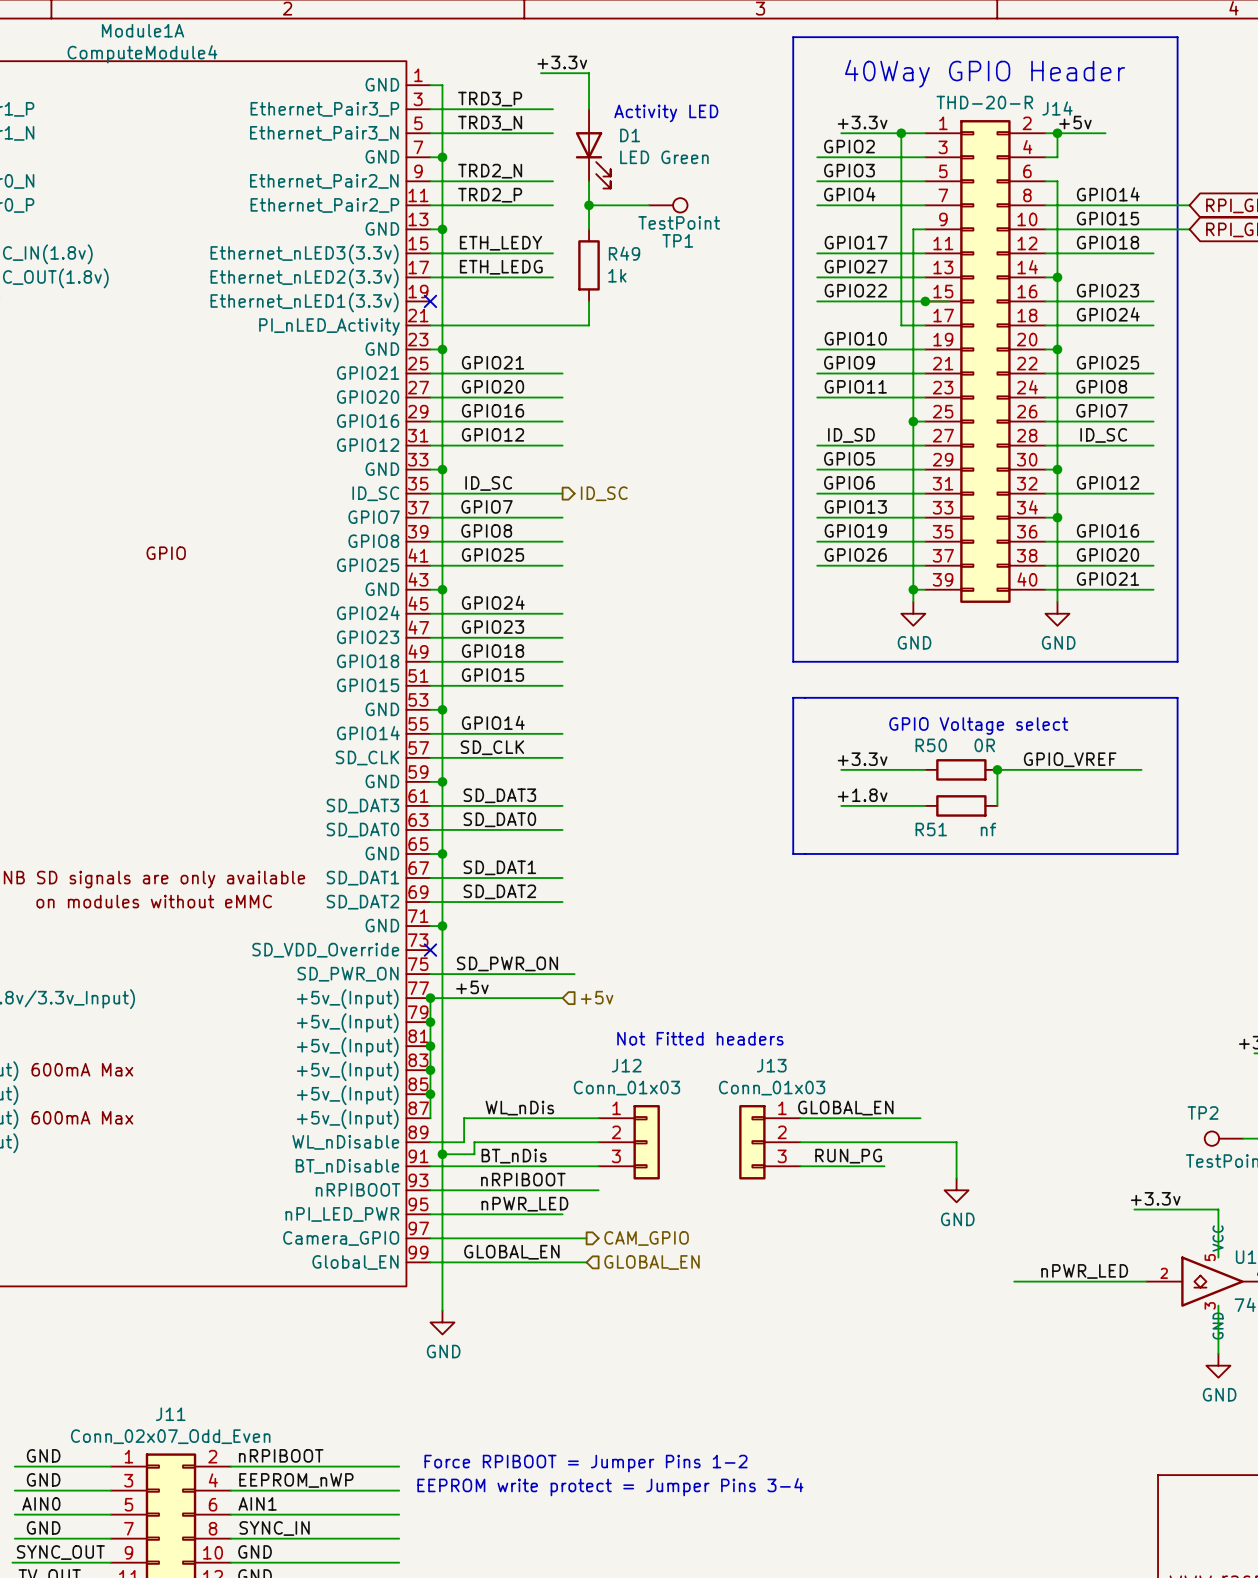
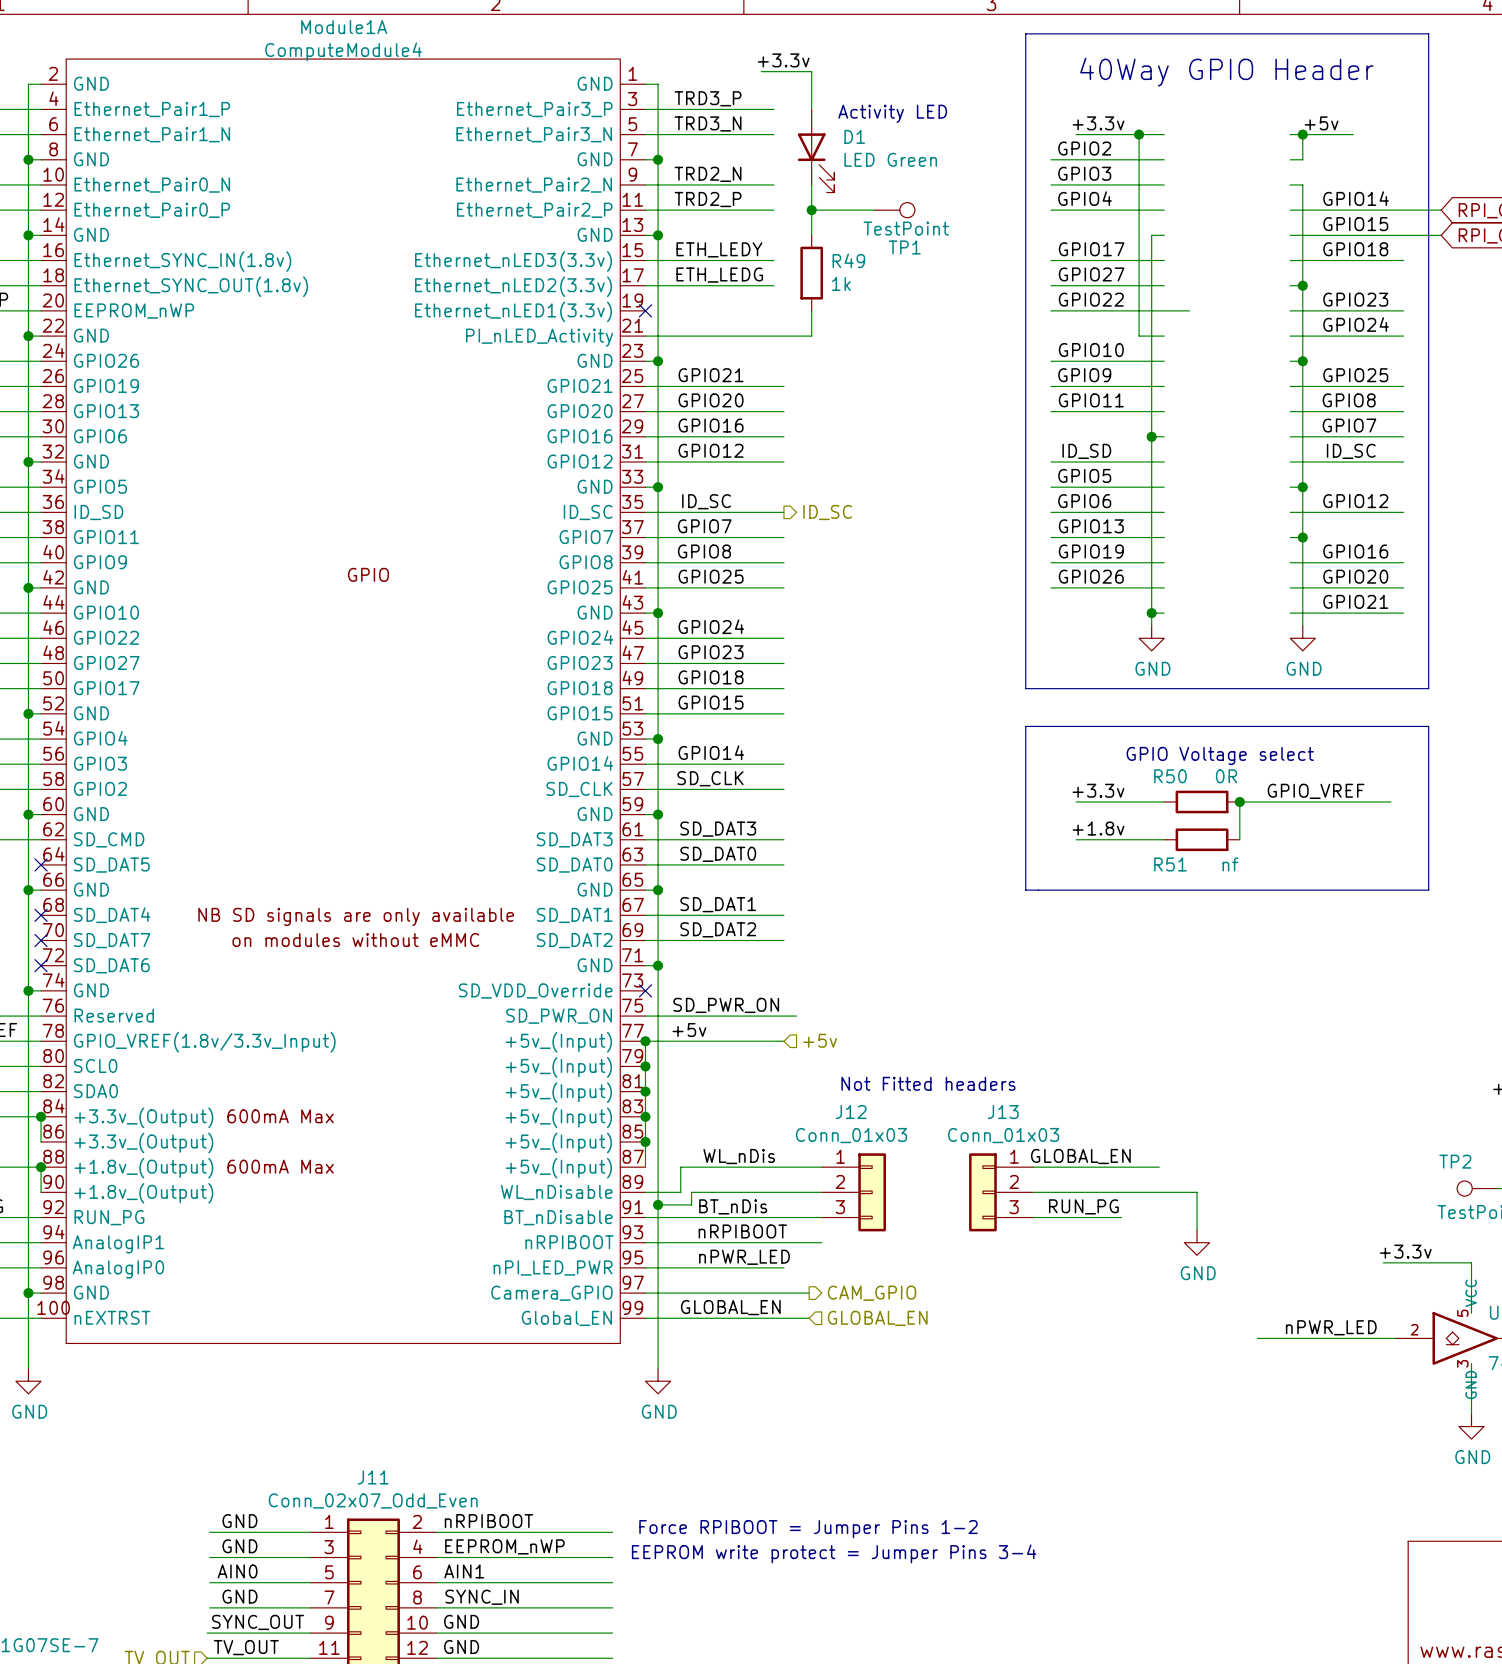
junction: (925, 301) -> none
J14: THD-20-R (985, 361) -> none

